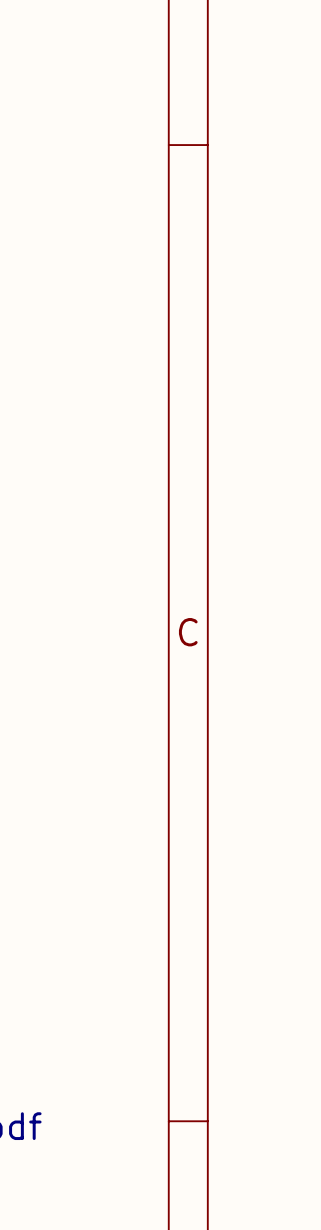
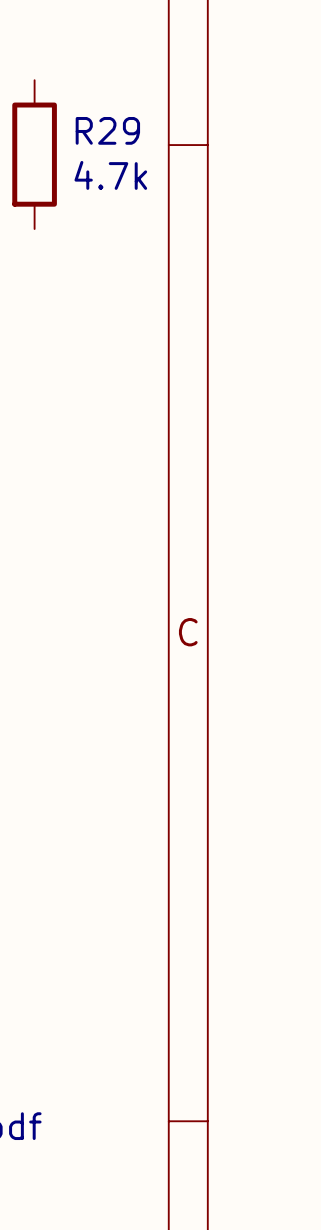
R29: none -> 4.7k (34, 154)

